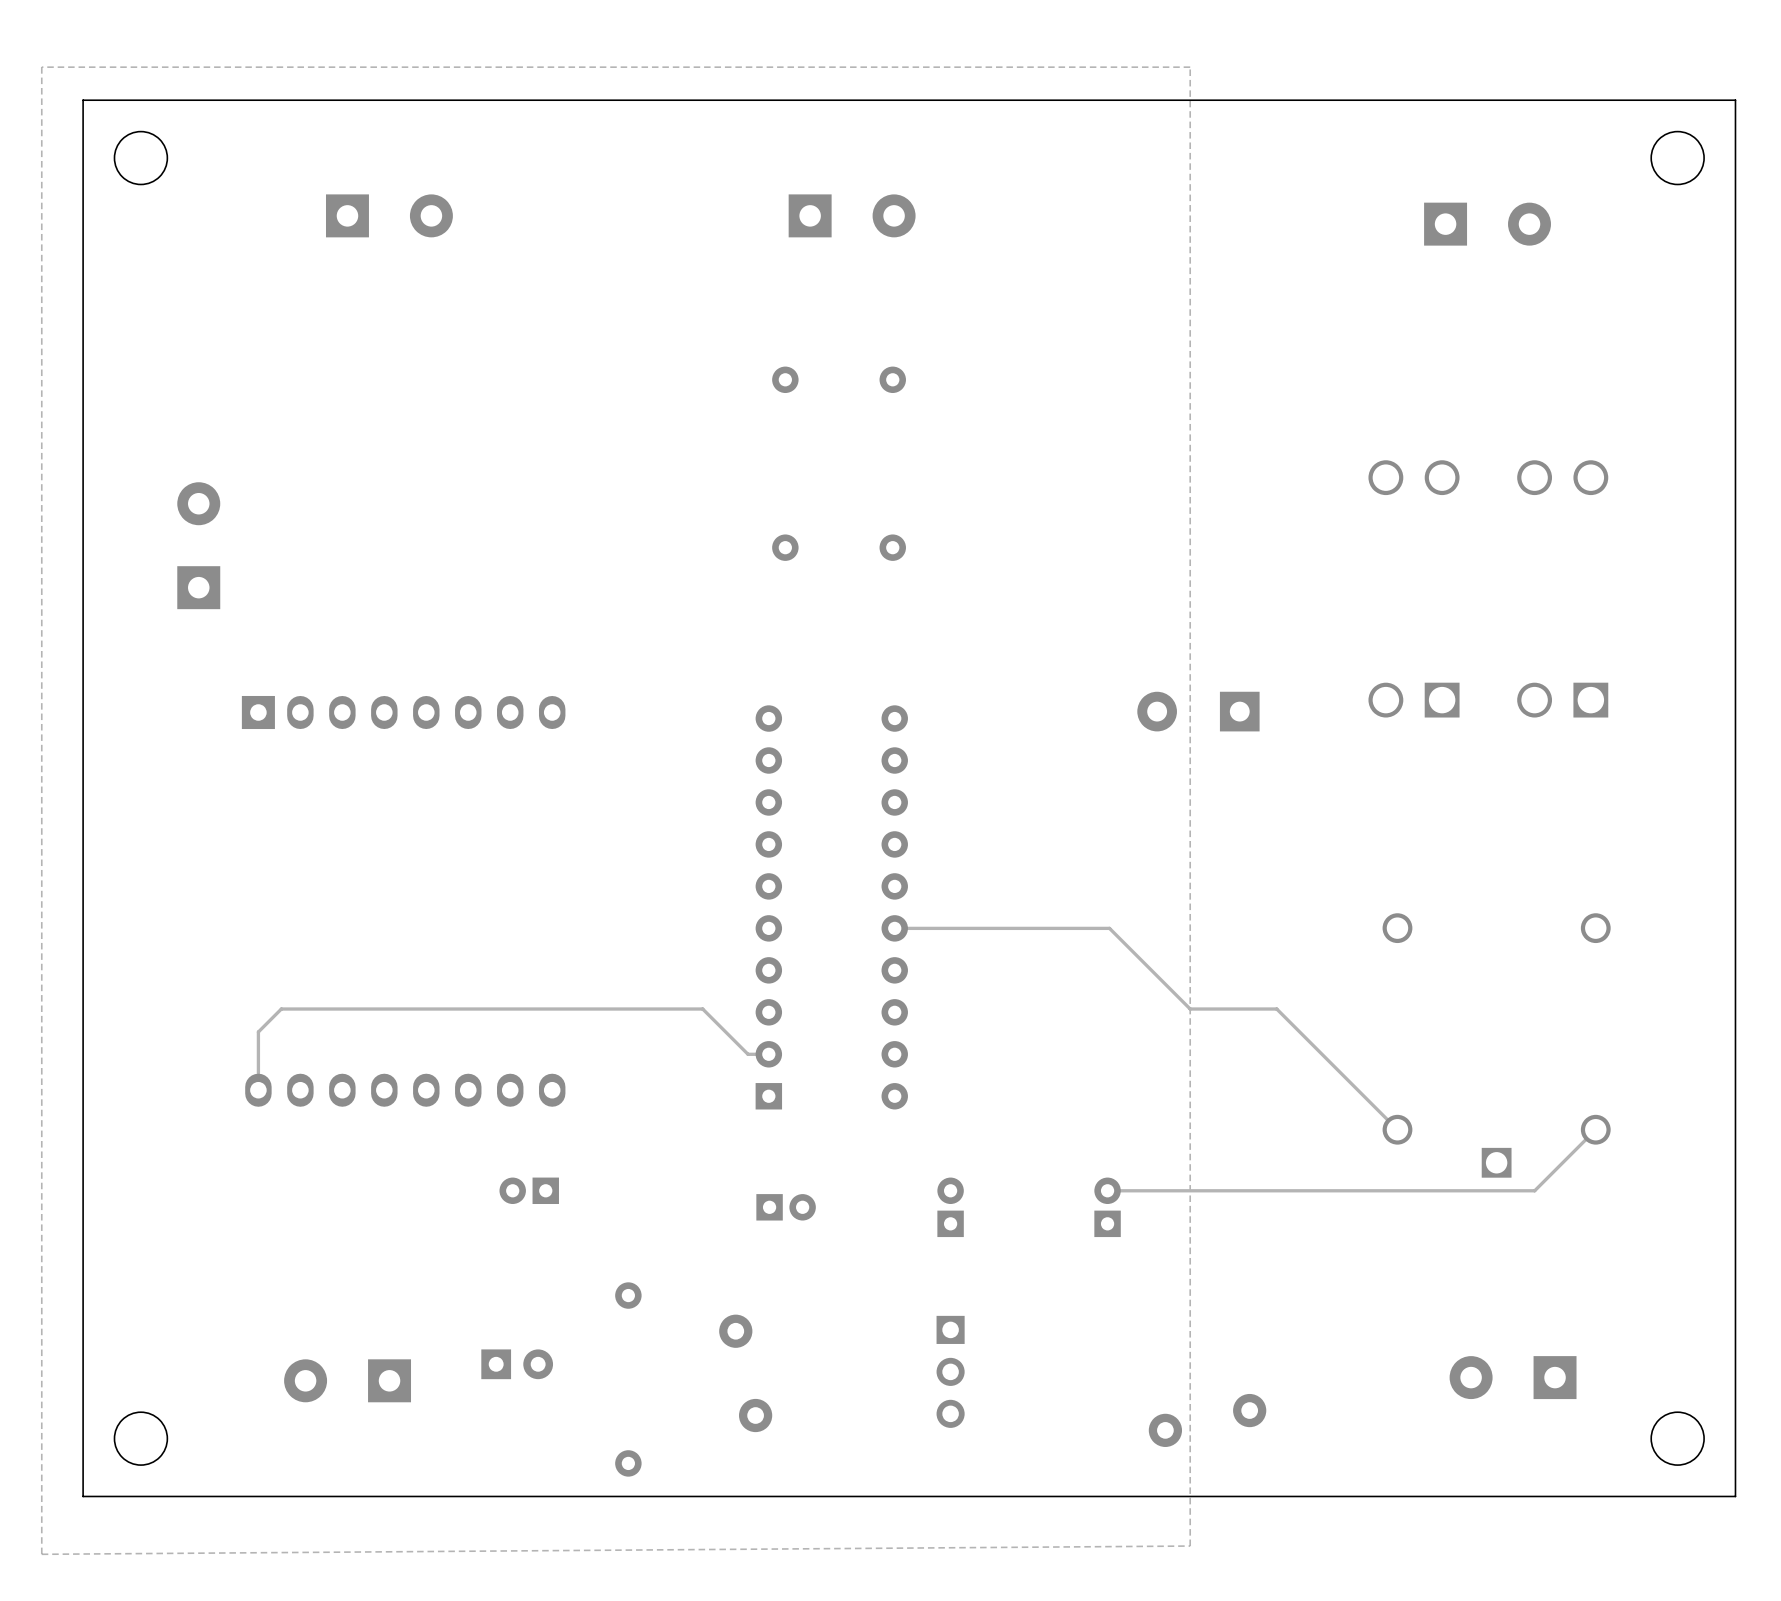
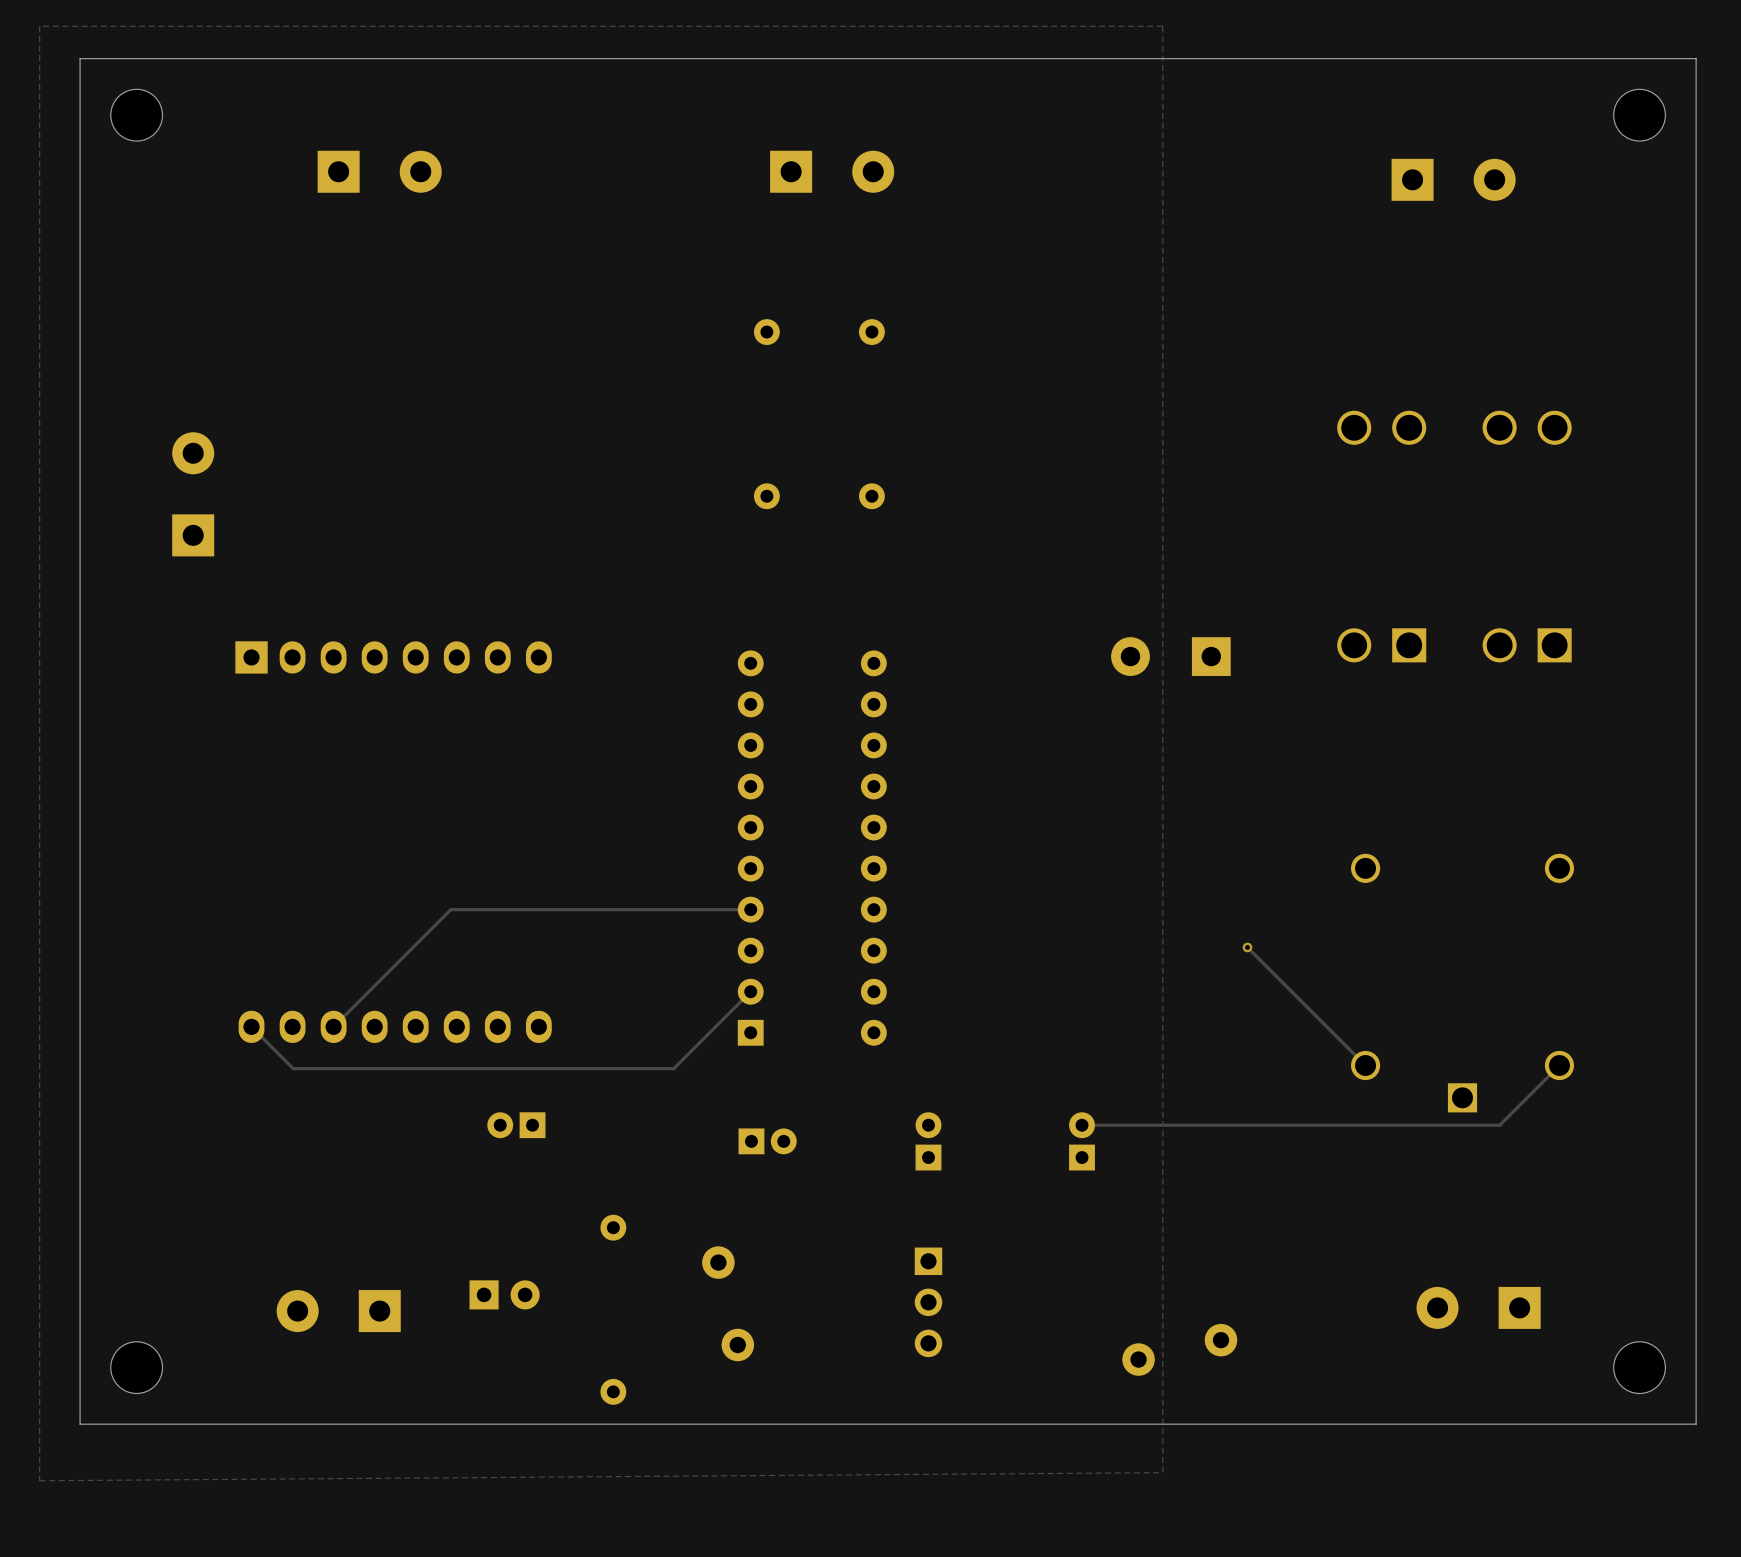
track: (894, 928) (1109, 928) (1190, 1009) (1276, 1009) -> none
track: none -> (750, 909) (450, 909) (333, 1026)
via: none -> (1247, 947)
track: (768, 1054) (748, 1054) (702, 1009) (281, 1009) (258, 1031) (258, 1090) -> (750, 991) (673, 1068) (293, 1068) (251, 1026)

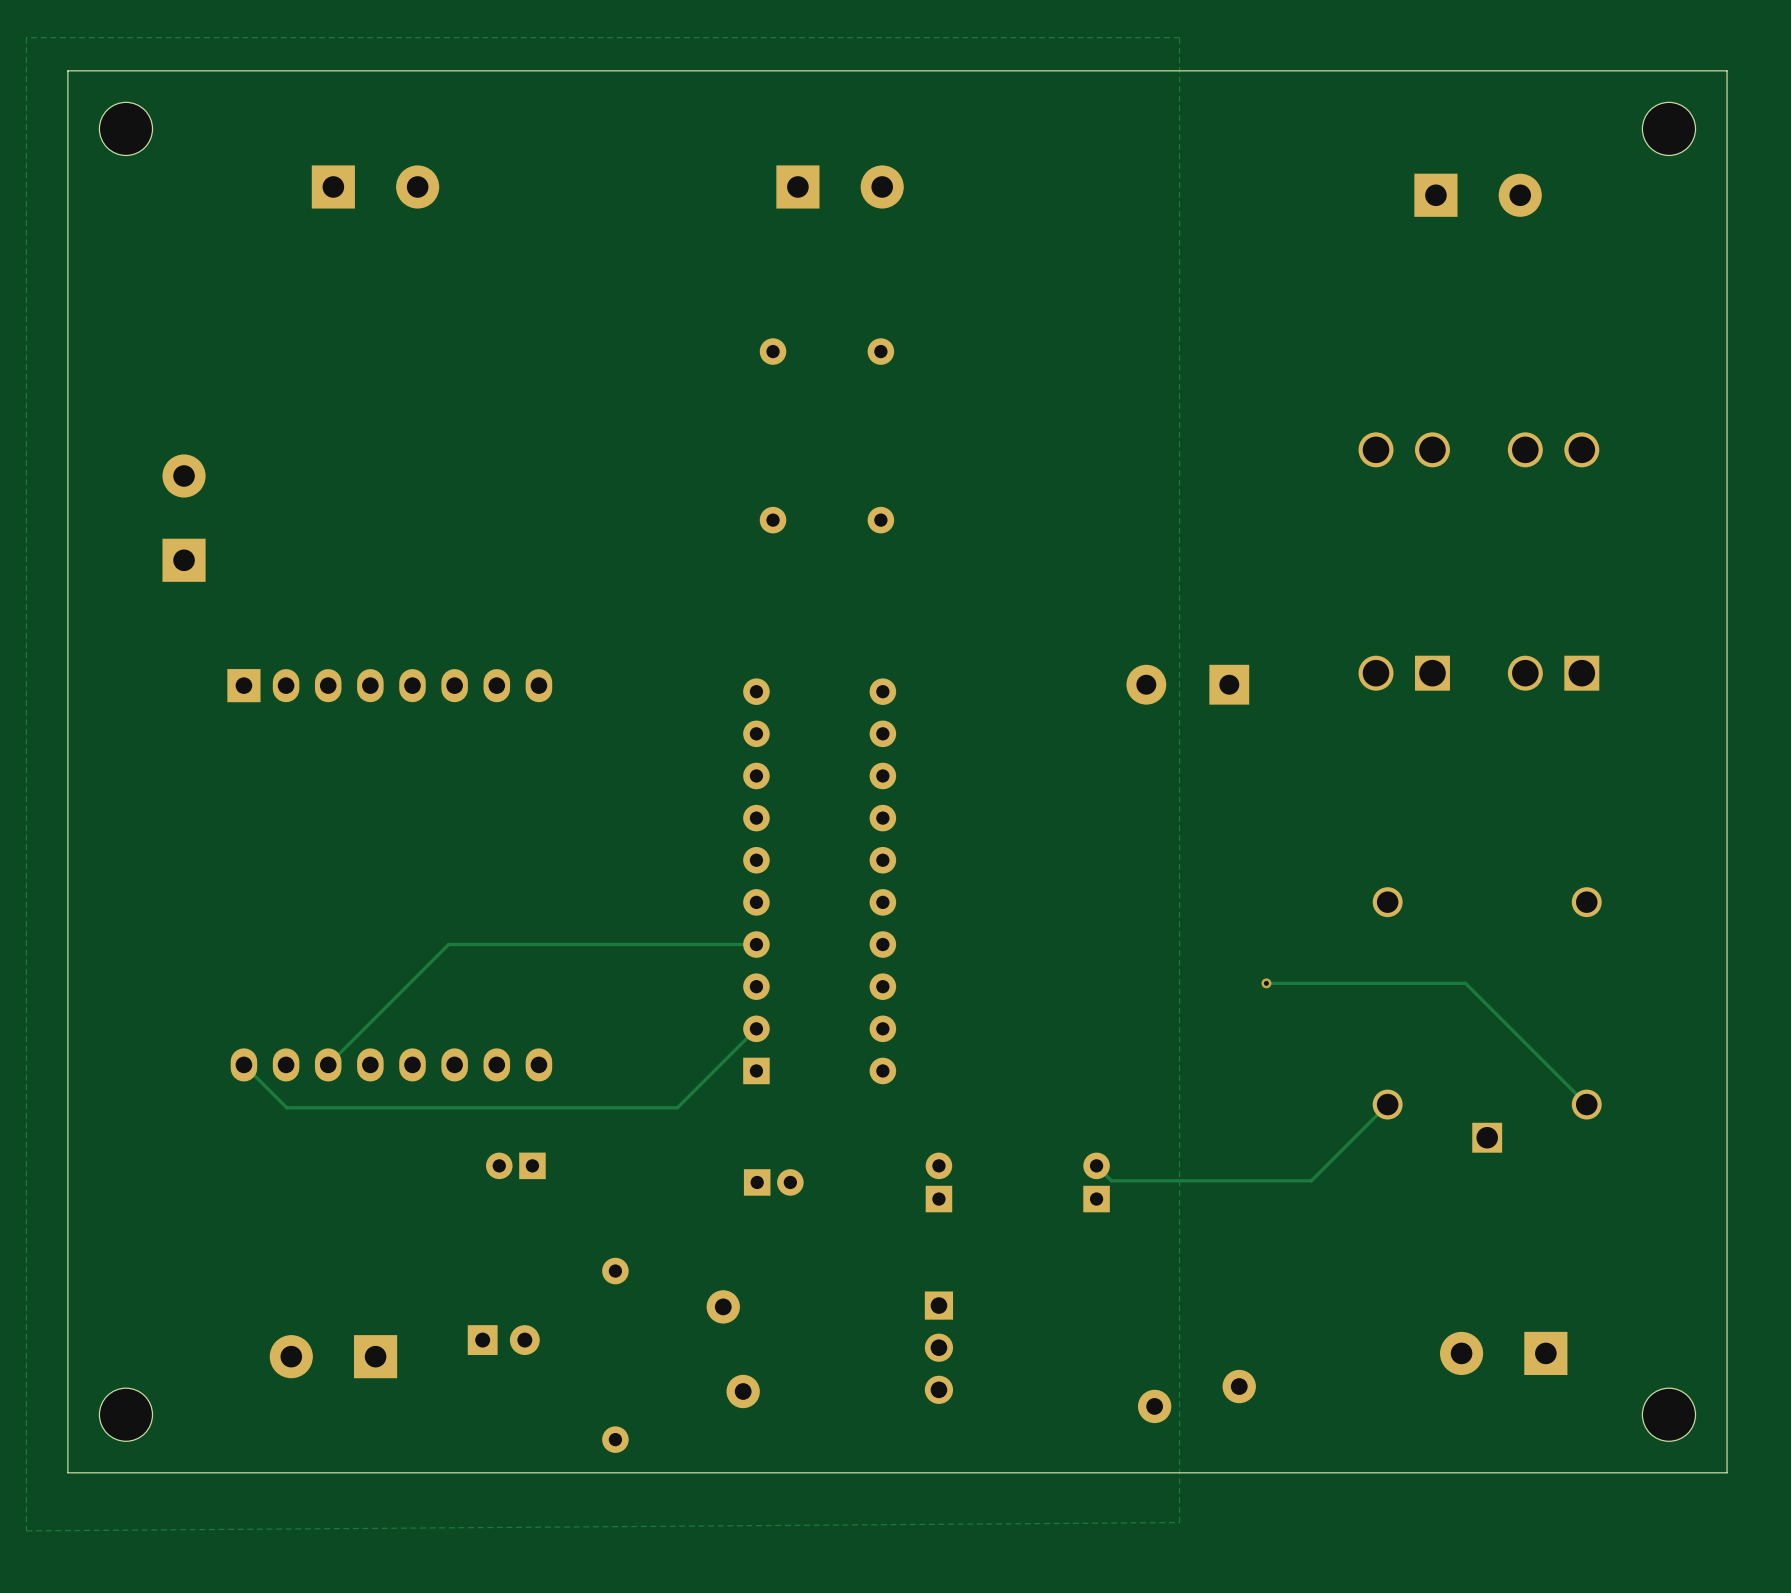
track: (1247, 947) (1365, 1065) -> (1266, 983) (1465, 983) (1586, 1104)
track: (1559, 1065) (1499, 1125) (1082, 1125) -> (1387, 1104) (1311, 1180) (1111, 1180) (1096, 1165)

